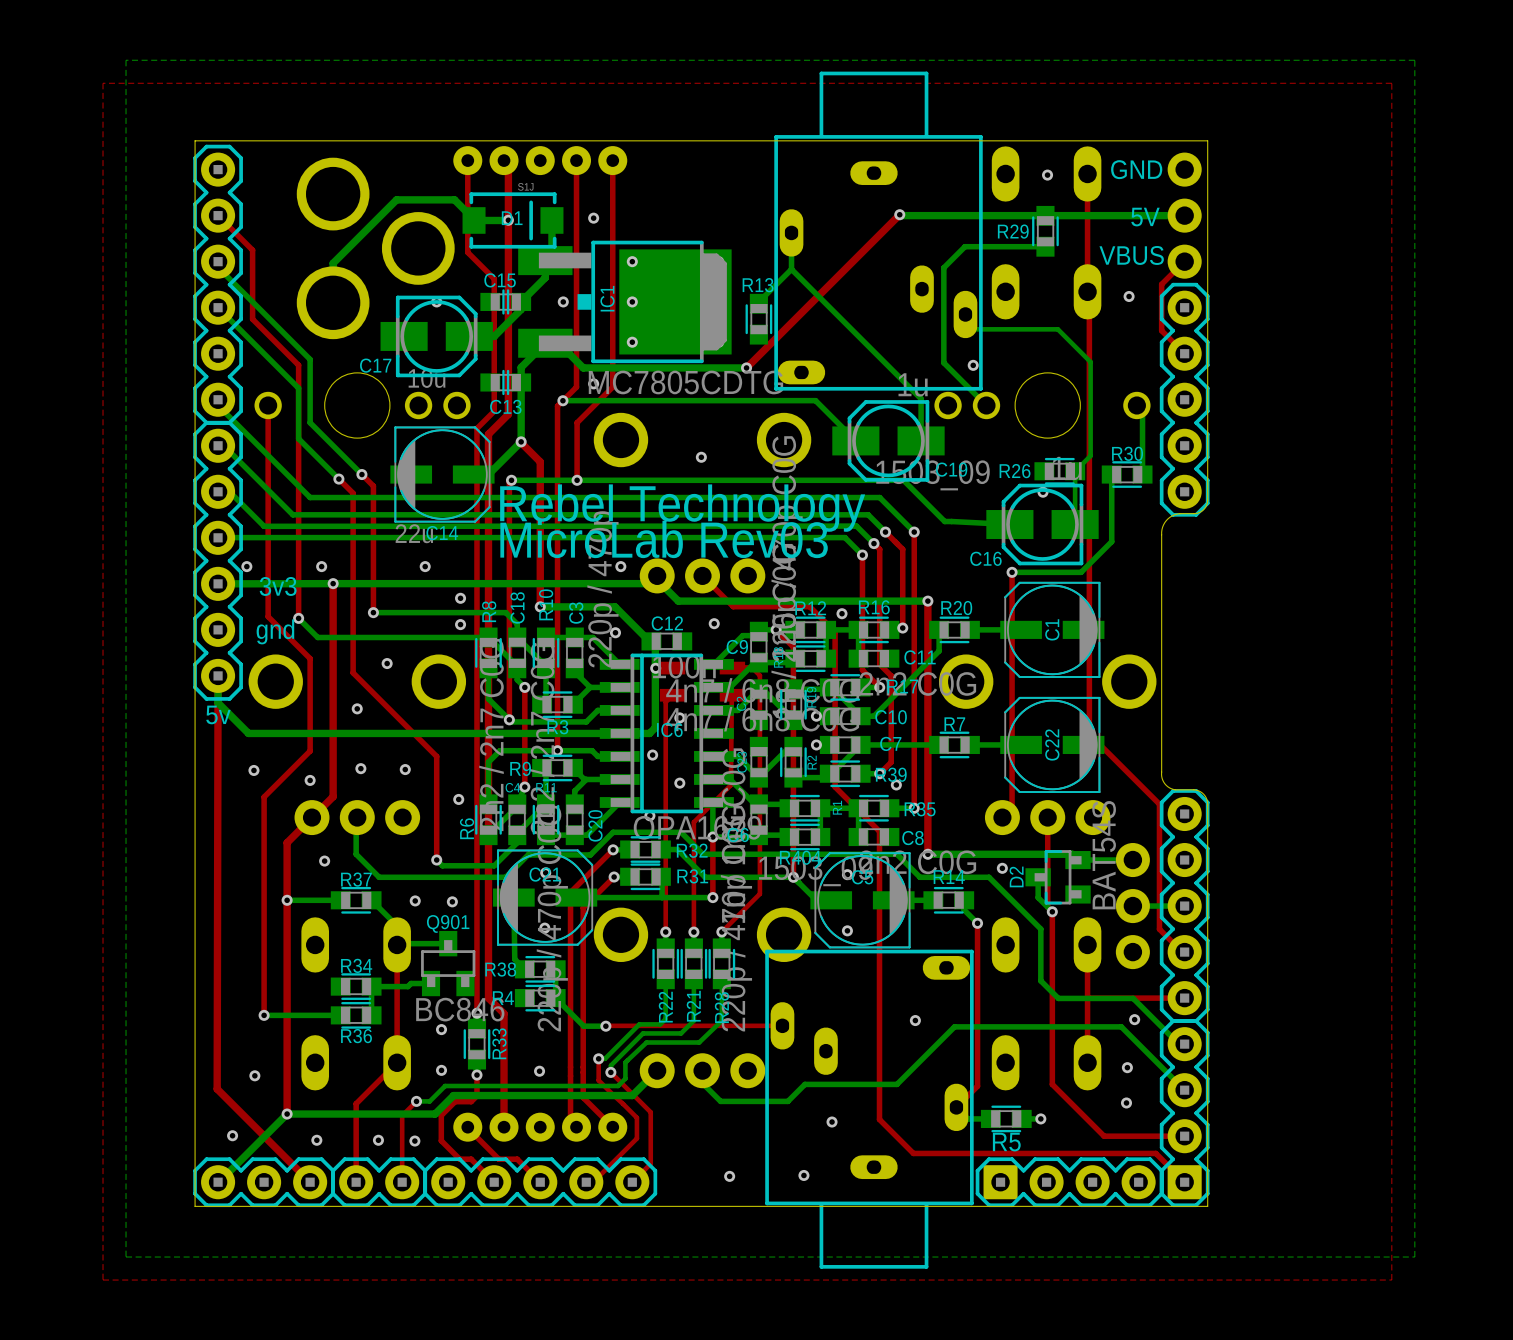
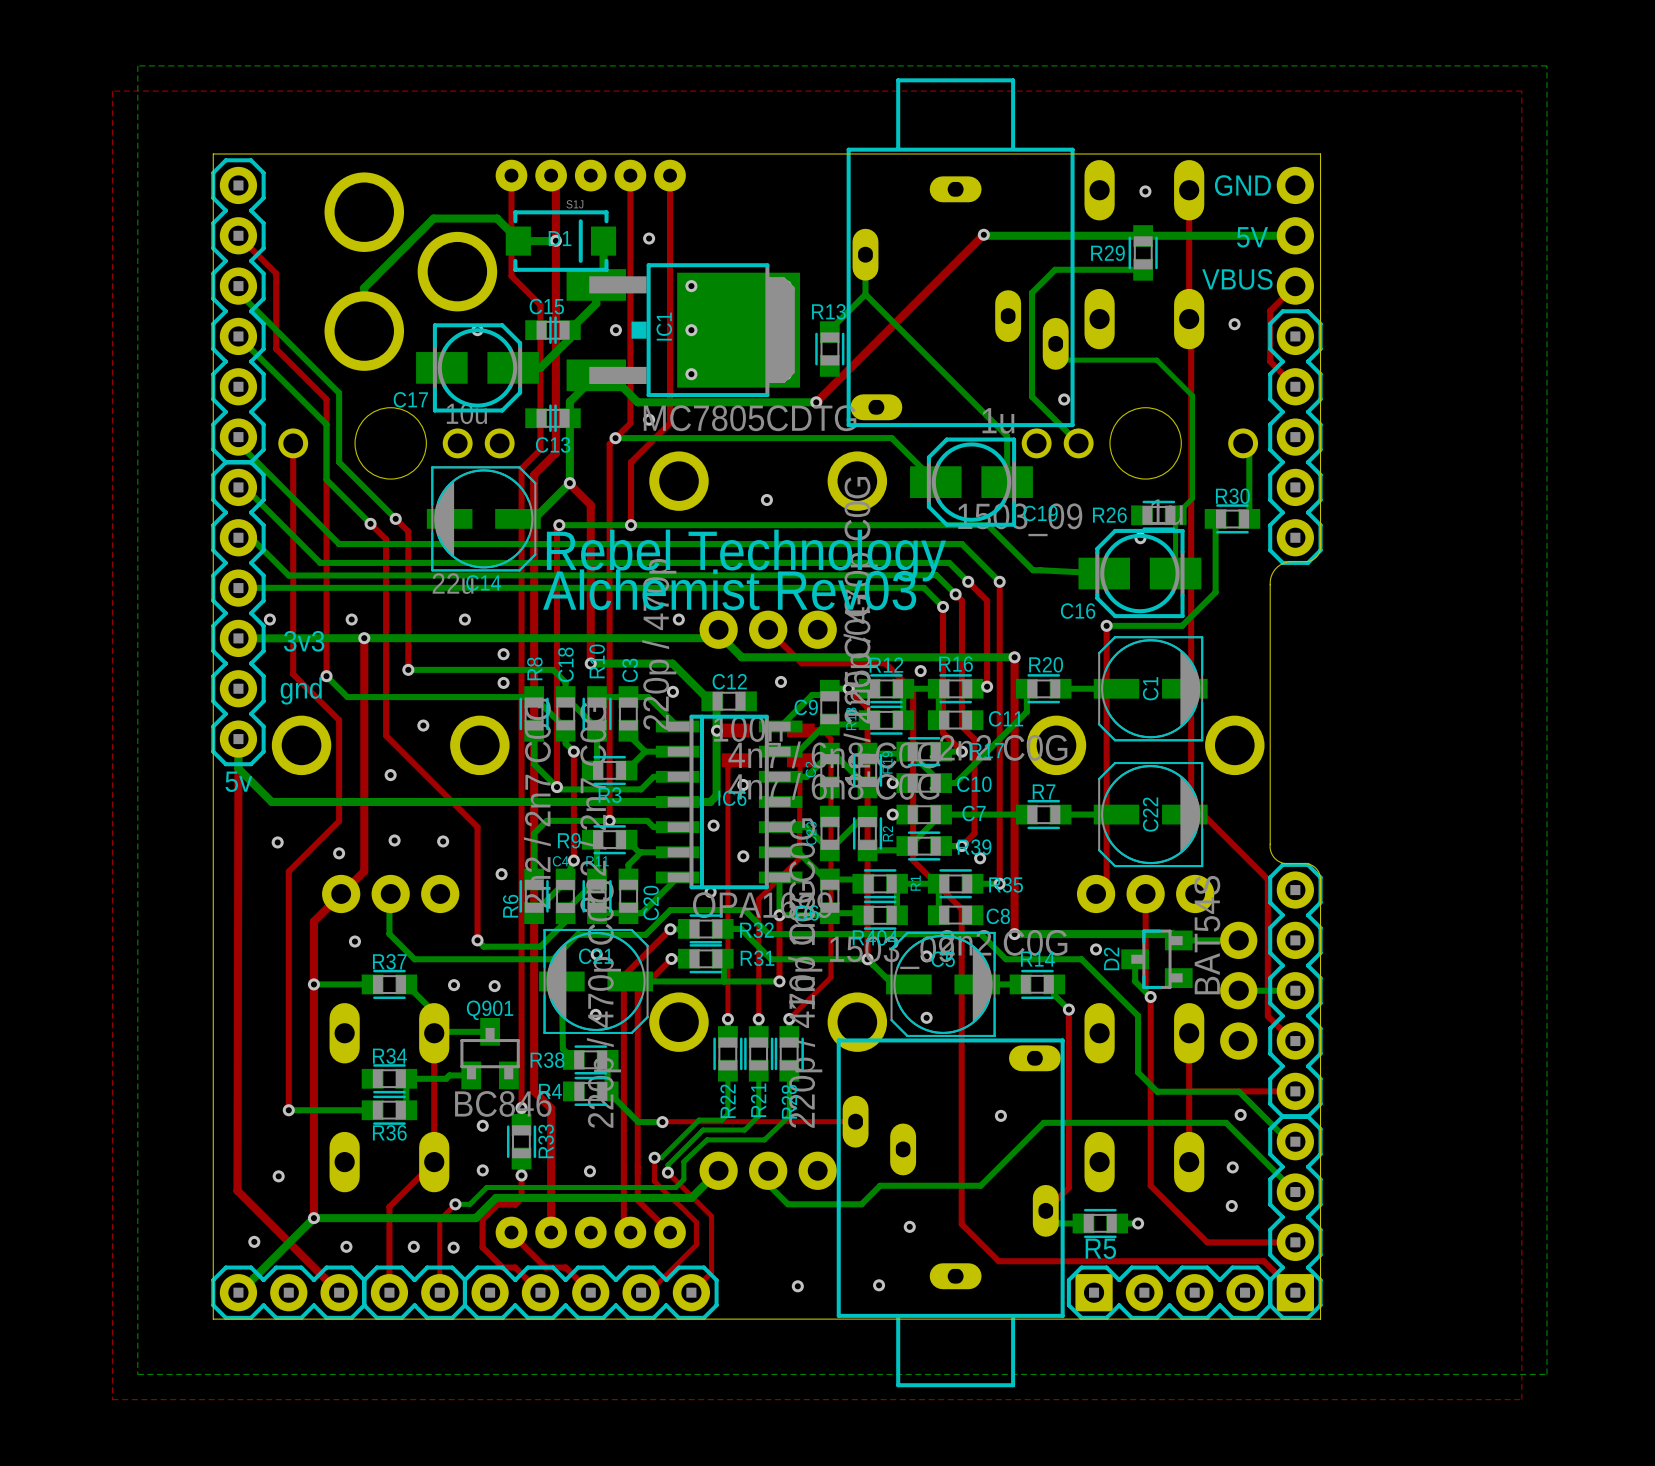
text: MicroLab Rev03 (664, 539) -> Alchemist Rev03 (729, 589)

